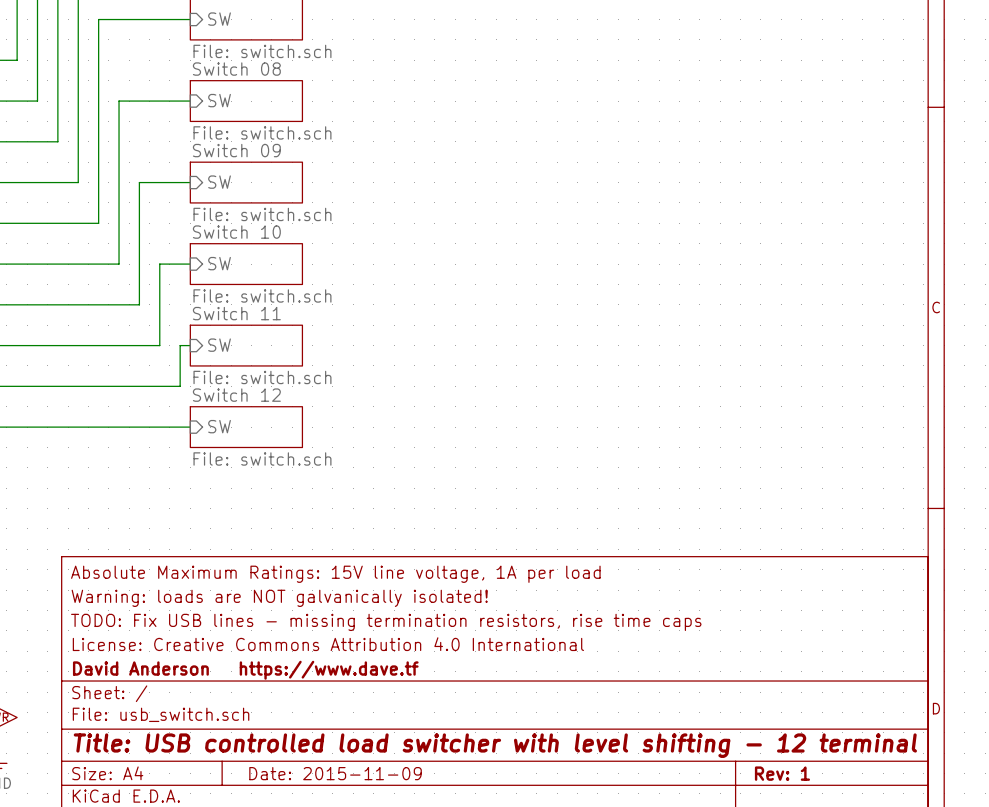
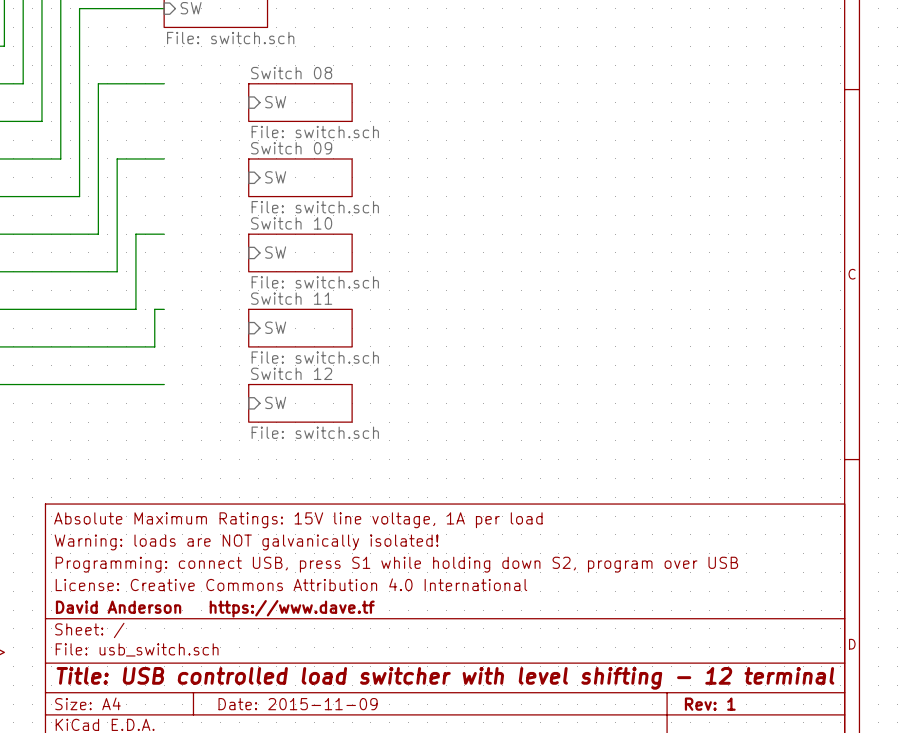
sheet pin: SW (219, 100) -> none
sheet Switch 08 position: (246, 101) -> (300, 102)
sheet pin: none -> SW (275, 102)
sheet pin: SW (219, 182) -> none
sheet Switch 09 position: (246, 182) -> (300, 177)
sheet pin: none -> SW (275, 177)
sheet pin: SW (219, 263) -> none
sheet Switch 10 position: (246, 264) -> (300, 252)
sheet pin: none -> SW (275, 252)
sheet pin: SW (219, 345) -> none
sheet Switch 11 position: (246, 345) -> (300, 328)
sheet pin: none -> SW (275, 327)
sheet pin: SW (219, 426) -> none
sheet Switch 12 position: (246, 427) -> (300, 403)
sheet pin: none -> SW (275, 402)
title block: TODO: Fix USB lines - missing termination resistors, rise time caps (386, 622) -> Programming: connect USB, press S1 while holding down S2, program over USB (396, 564)

